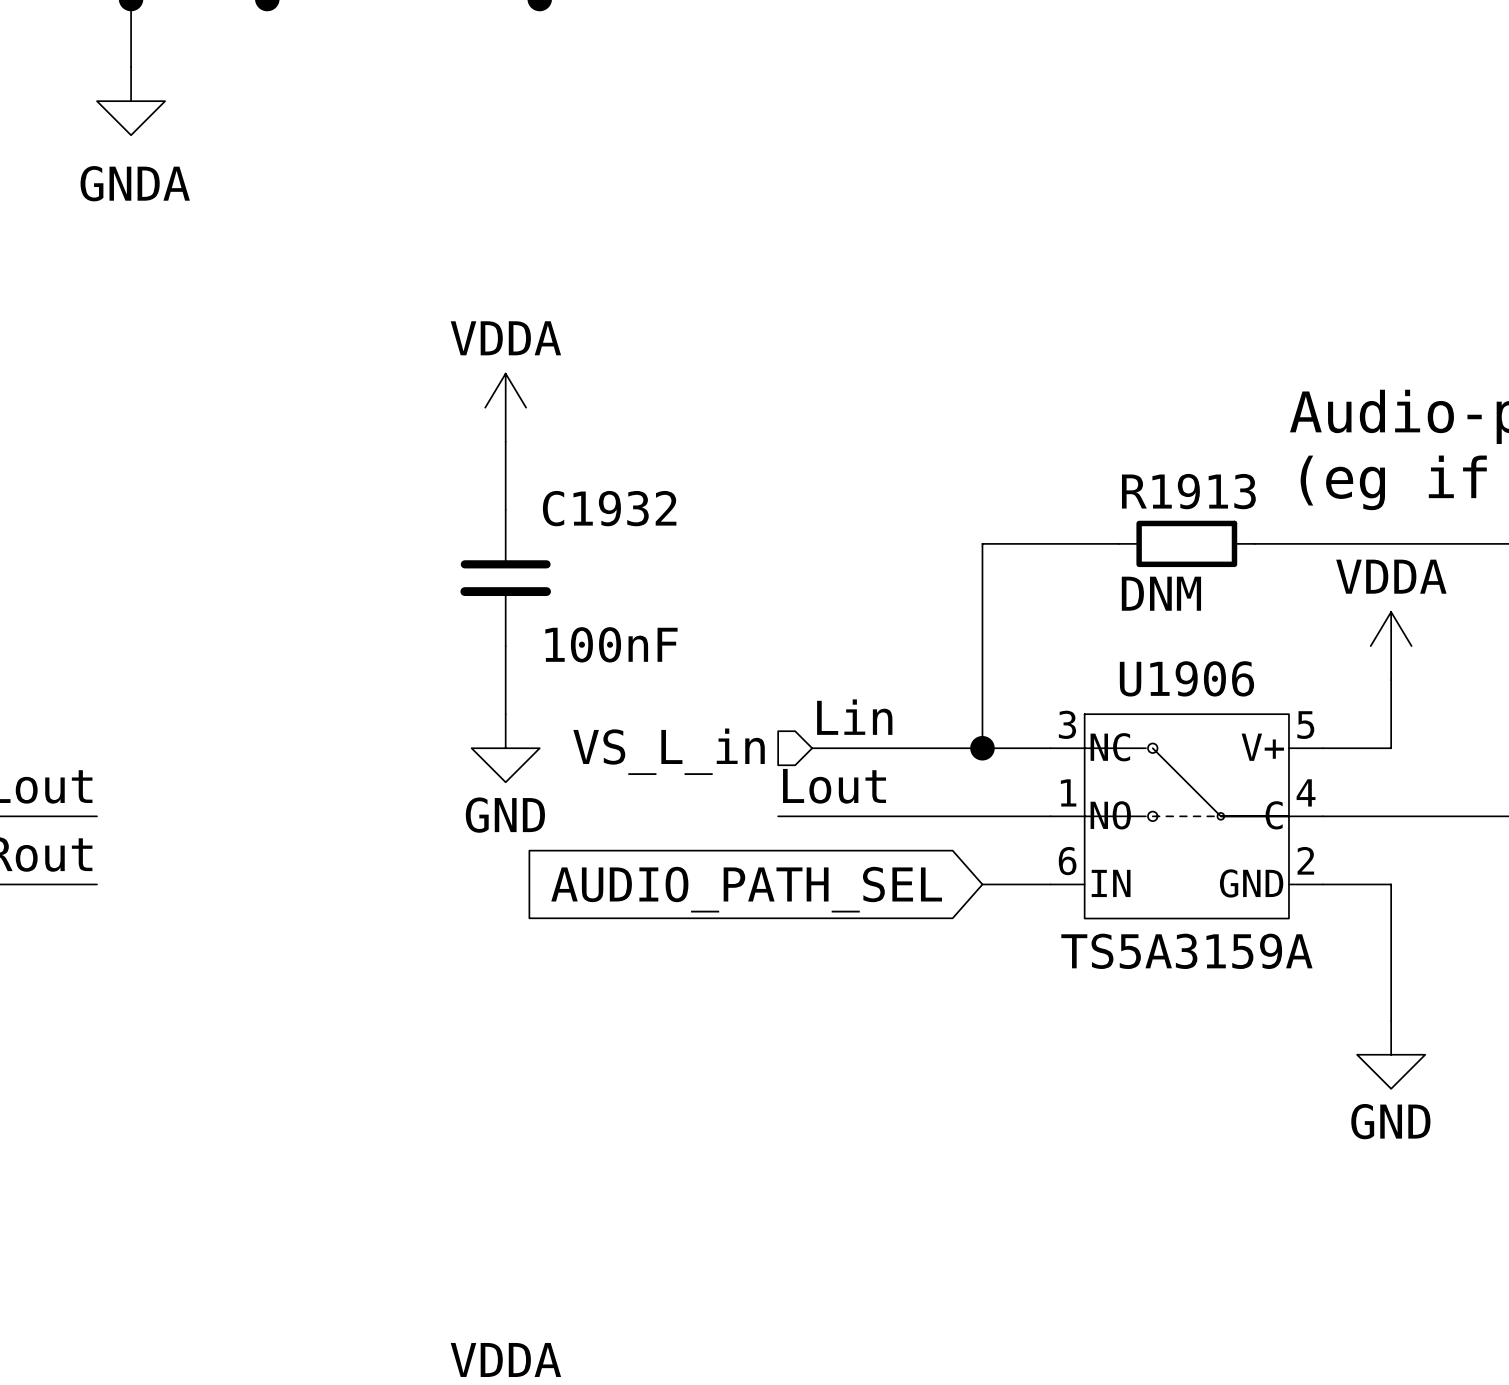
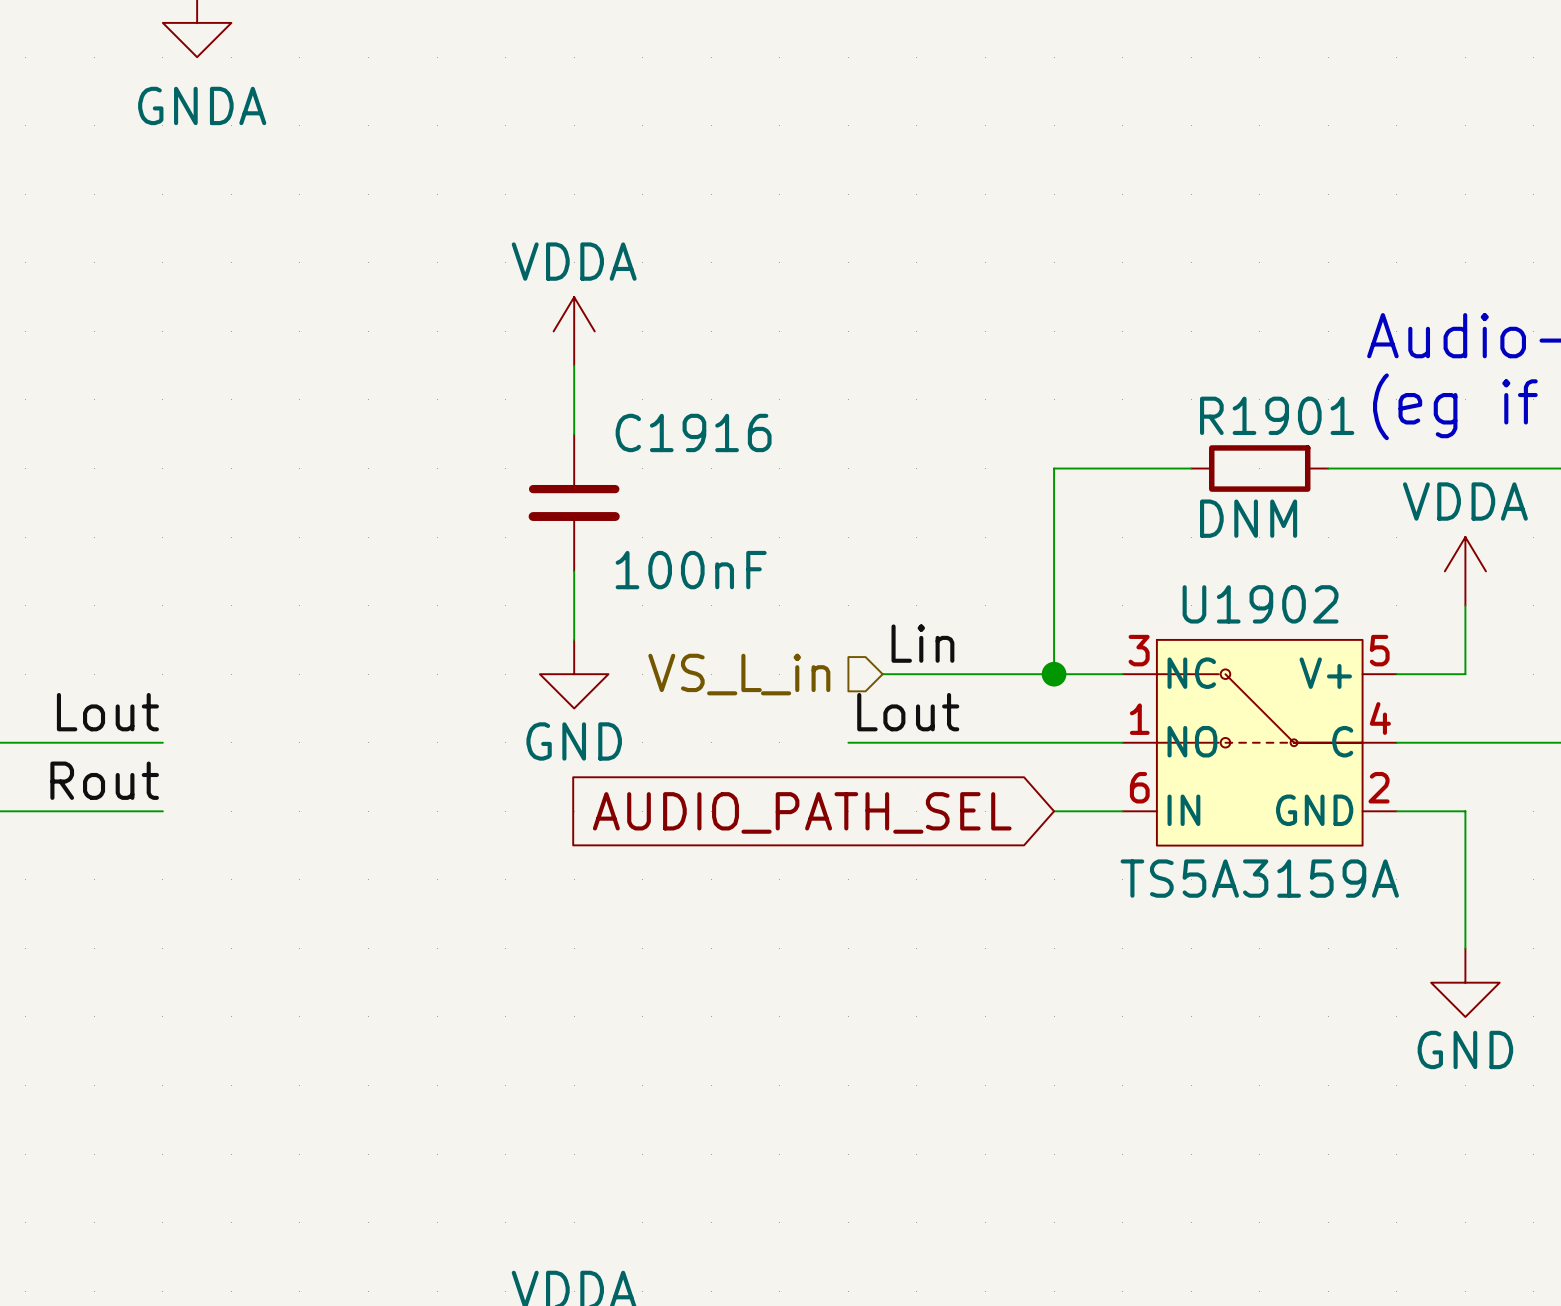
R1913 name: R1913 (1188, 491) -> R1901 (1277, 415)
C1932 name: C1932 (609, 508) -> C1916 (693, 432)
U1906 name: U1906 (1186, 678) -> U1902 (1260, 604)

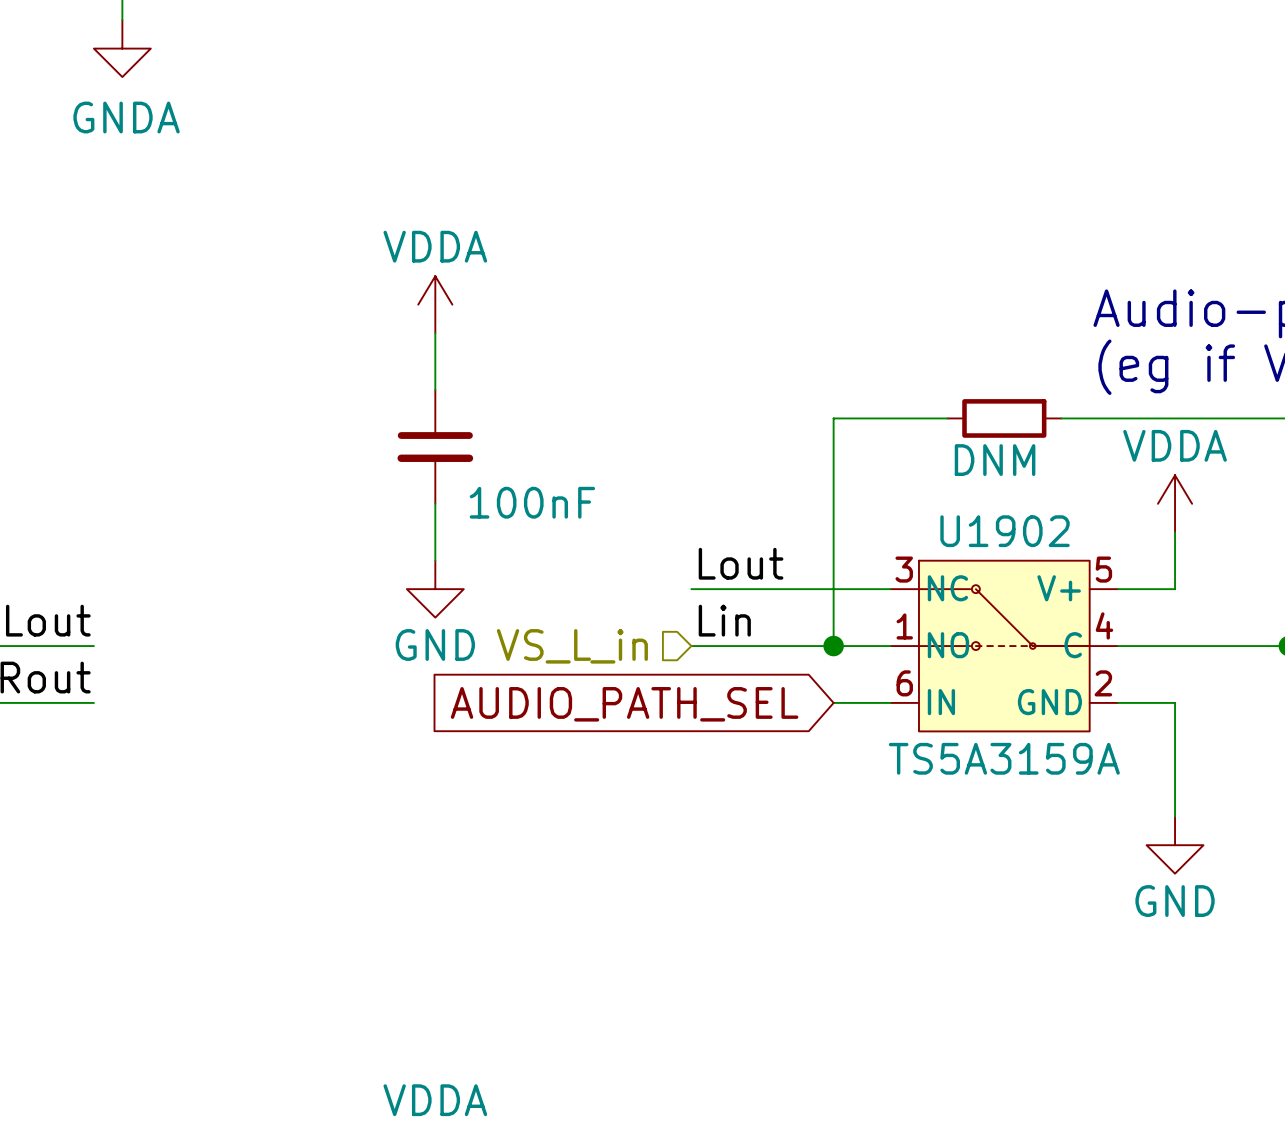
R1901 name: R1901 (1277, 415) -> none
C1916 name: C1916 (693, 432) -> none
label: Lin (922, 643) -> Lout (741, 563)
hierarchical label position: VS_L_in (739, 674) -> VS_L_in (572, 646)
wire: none -> (833, 589) (833, 646)
junction position: (1054, 674) -> (833, 646)
label: Lout (908, 712) -> none
label: none -> Lin (724, 620)
wire: (848, 742) (882, 742) -> none

